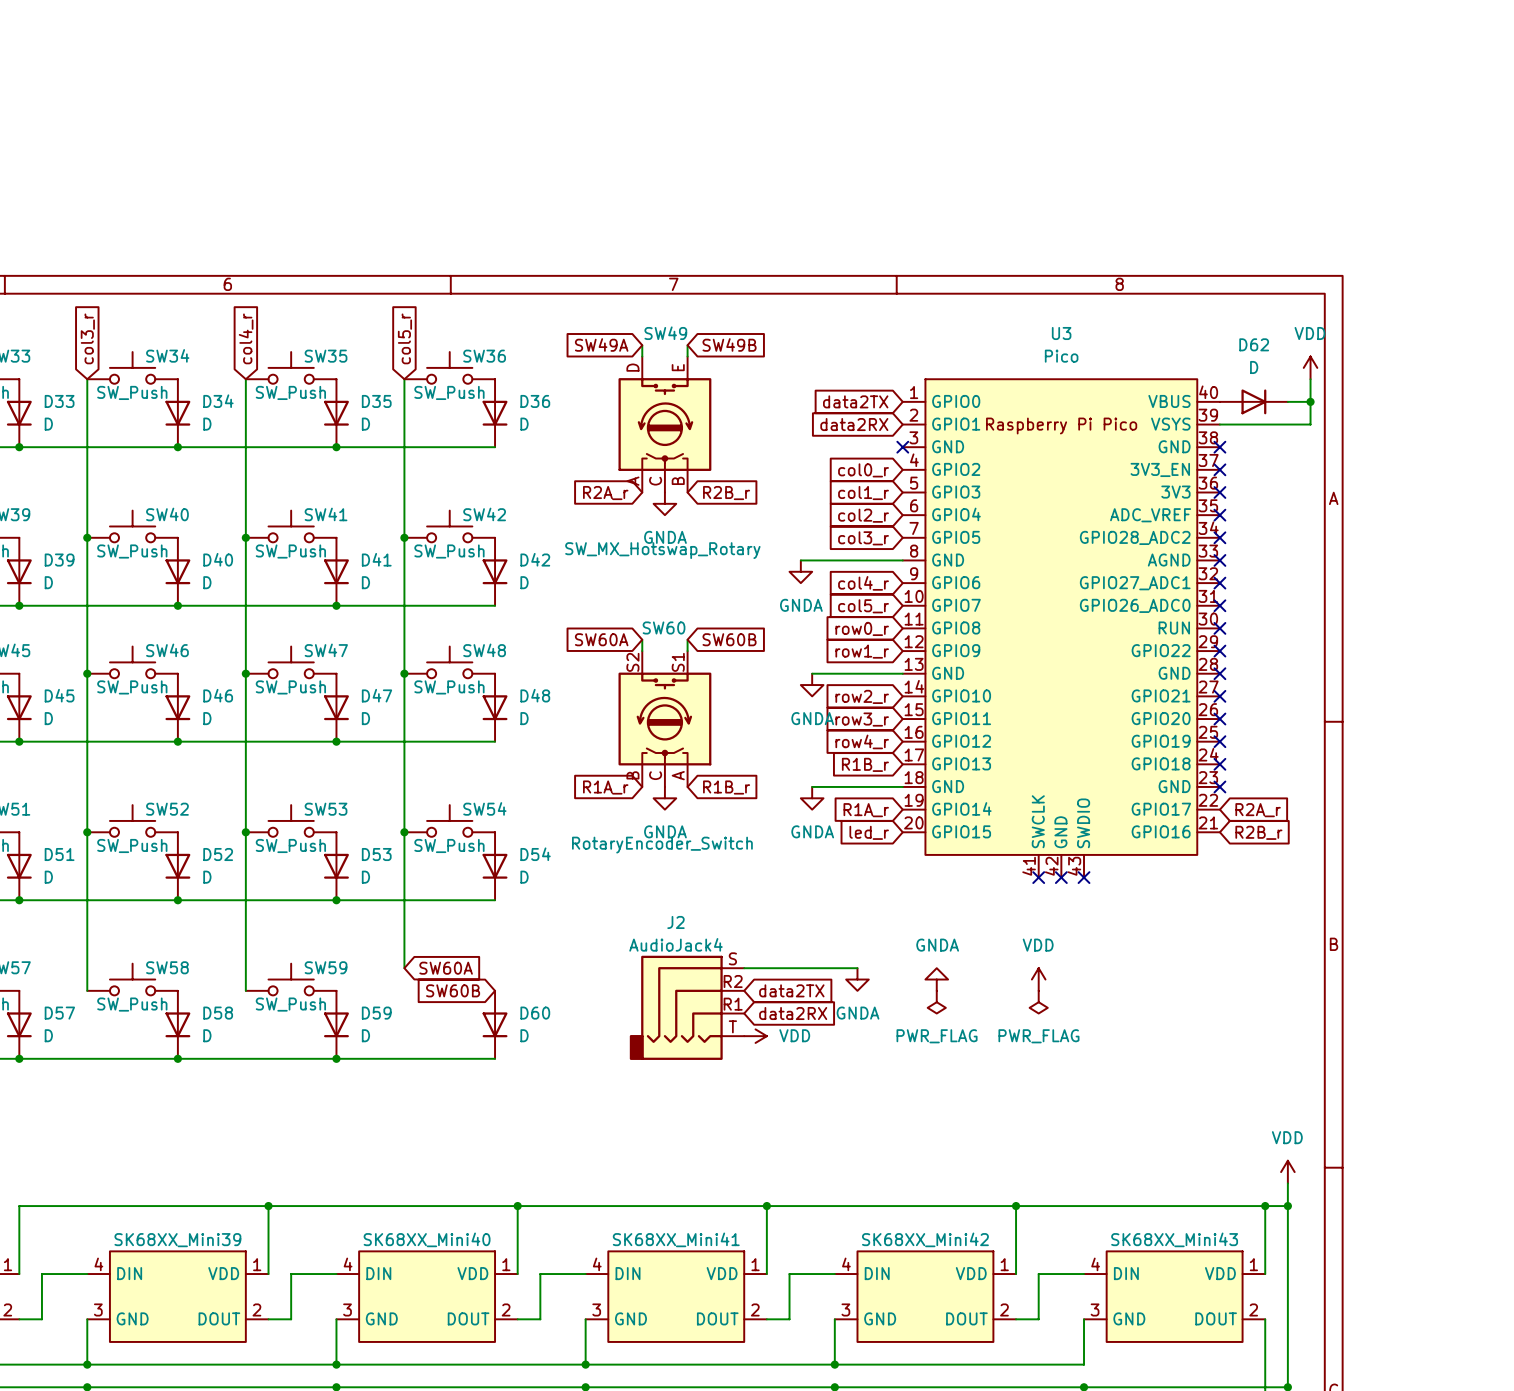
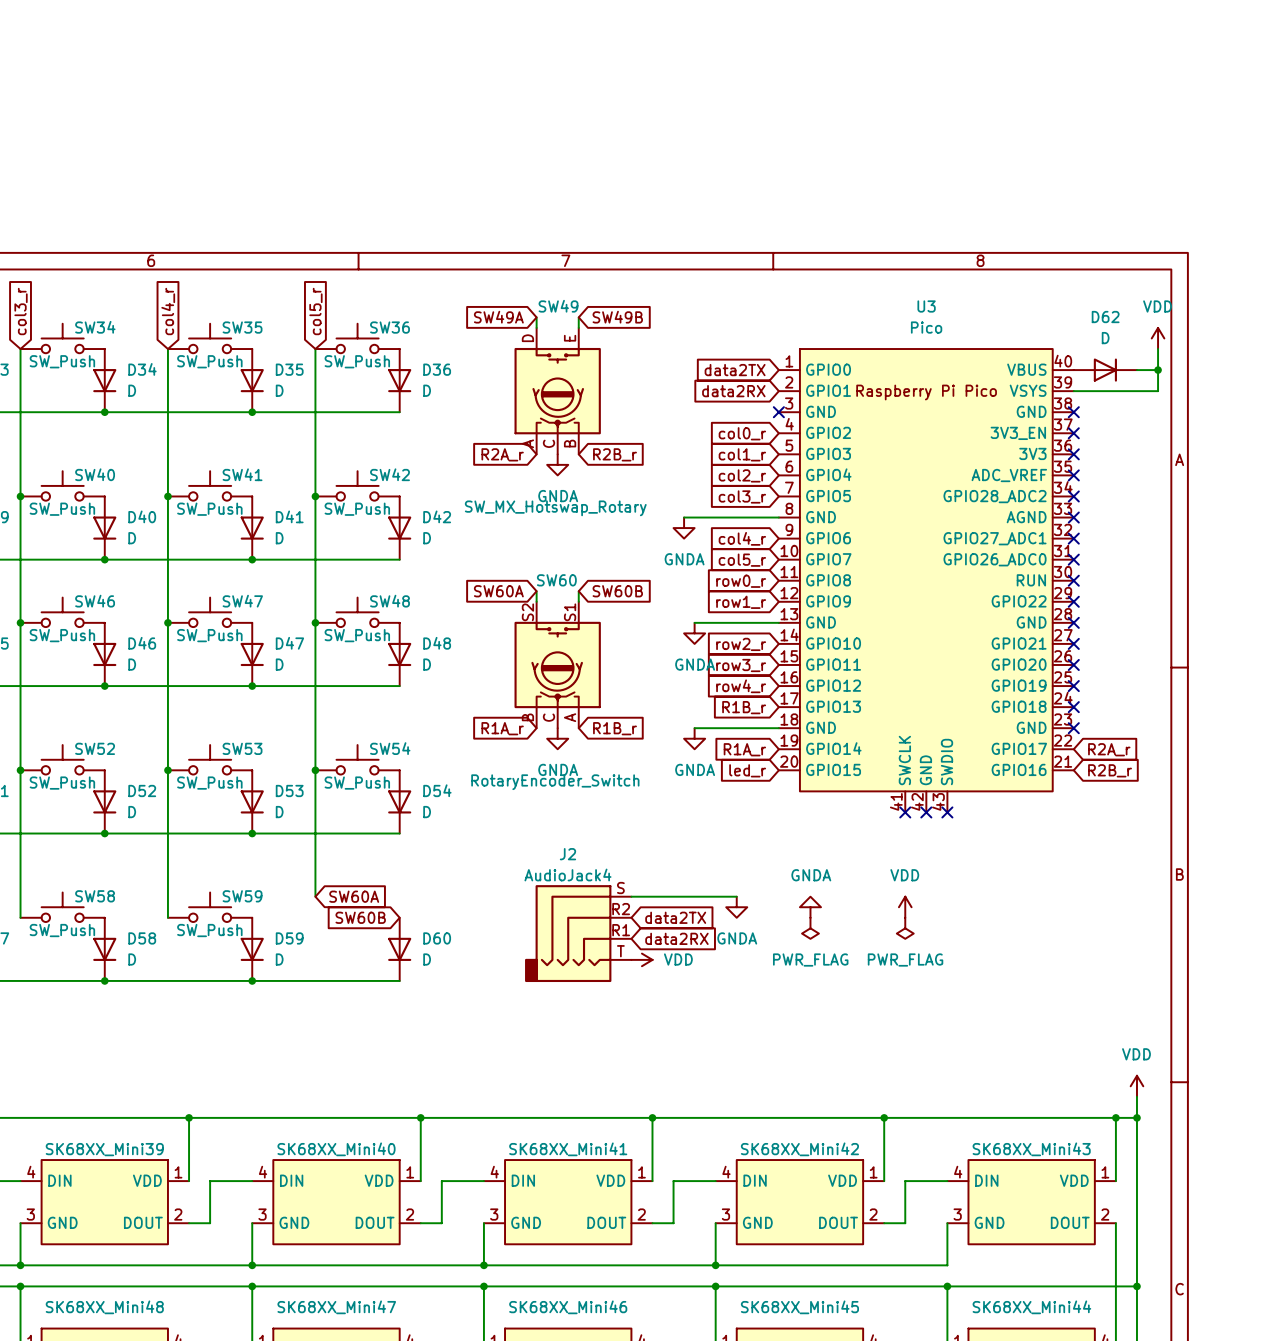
SW49 symbol: [618, 356, 712, 493] -> [514, 327, 601, 455]
SW60 symbol: [618, 651, 712, 787] -> [514, 601, 601, 729]

